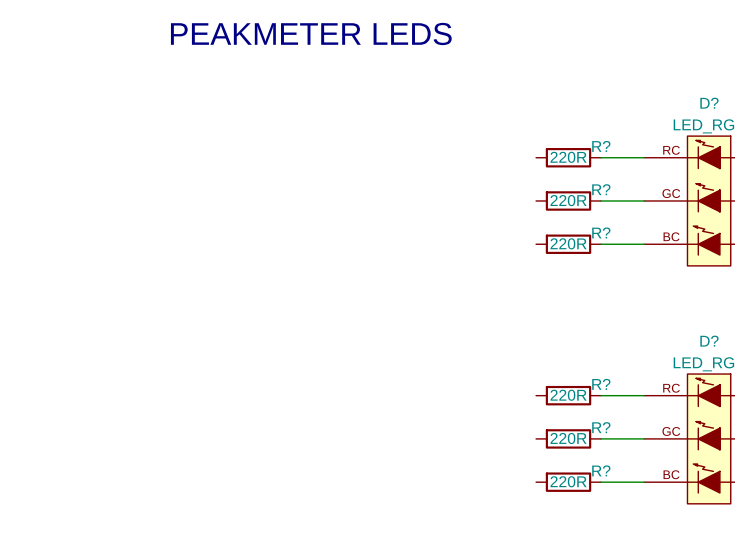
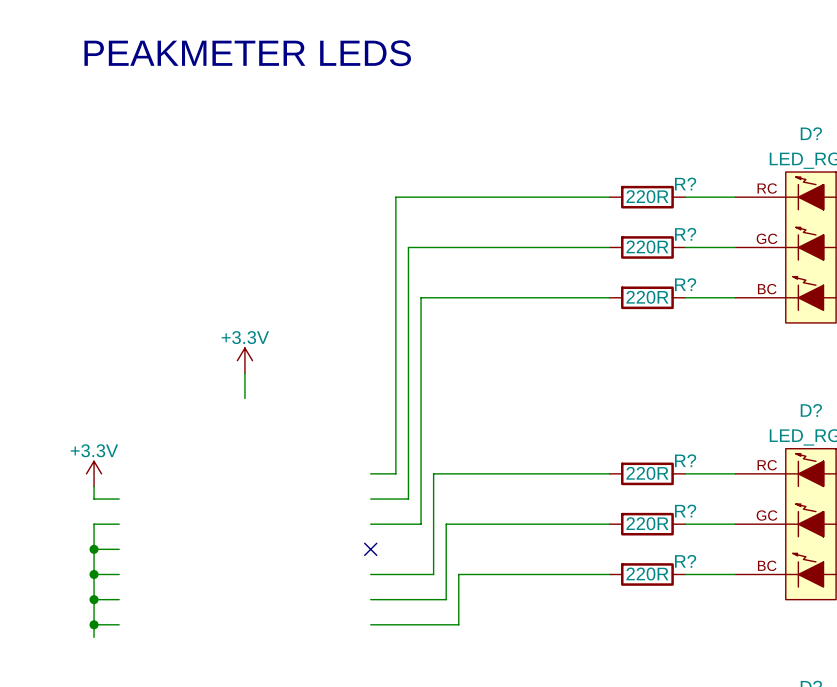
text position: PEAKMETER LEDS (311, 33) -> PEAKMETER LEDS (247, 53)
wire: none -> (609, 197) (395, 197) (395, 473) (370, 473)
wire: none -> (609, 247) (408, 247) (408, 499) (370, 499)
wire: none -> (609, 297) (421, 297) (421, 524) (370, 524)
power symbol: none -> +3.3V (244, 360)
wire: none -> (244, 373) (244, 398)
power symbol: none -> +3.3V (94, 473)
wire: none -> (609, 473) (433, 473) (433, 574) (370, 574)
wire: none -> (94, 486) (94, 499) (119, 499)
wire: none -> (119, 524) (94, 524) (94, 637)
wire: none -> (609, 524) (446, 524) (446, 599) (370, 599)
wire: none -> (94, 549) (119, 549)
junction: none -> (94, 549)
no-connect mark: none -> (370, 549)
wire: none -> (94, 574) (119, 574)
junction: none -> (94, 574)
wire: none -> (609, 574) (458, 574) (458, 624) (370, 624)
wire: none -> (94, 599) (119, 599)
junction: none -> (94, 599)
wire: none -> (94, 624) (119, 624)
junction: none -> (94, 624)

